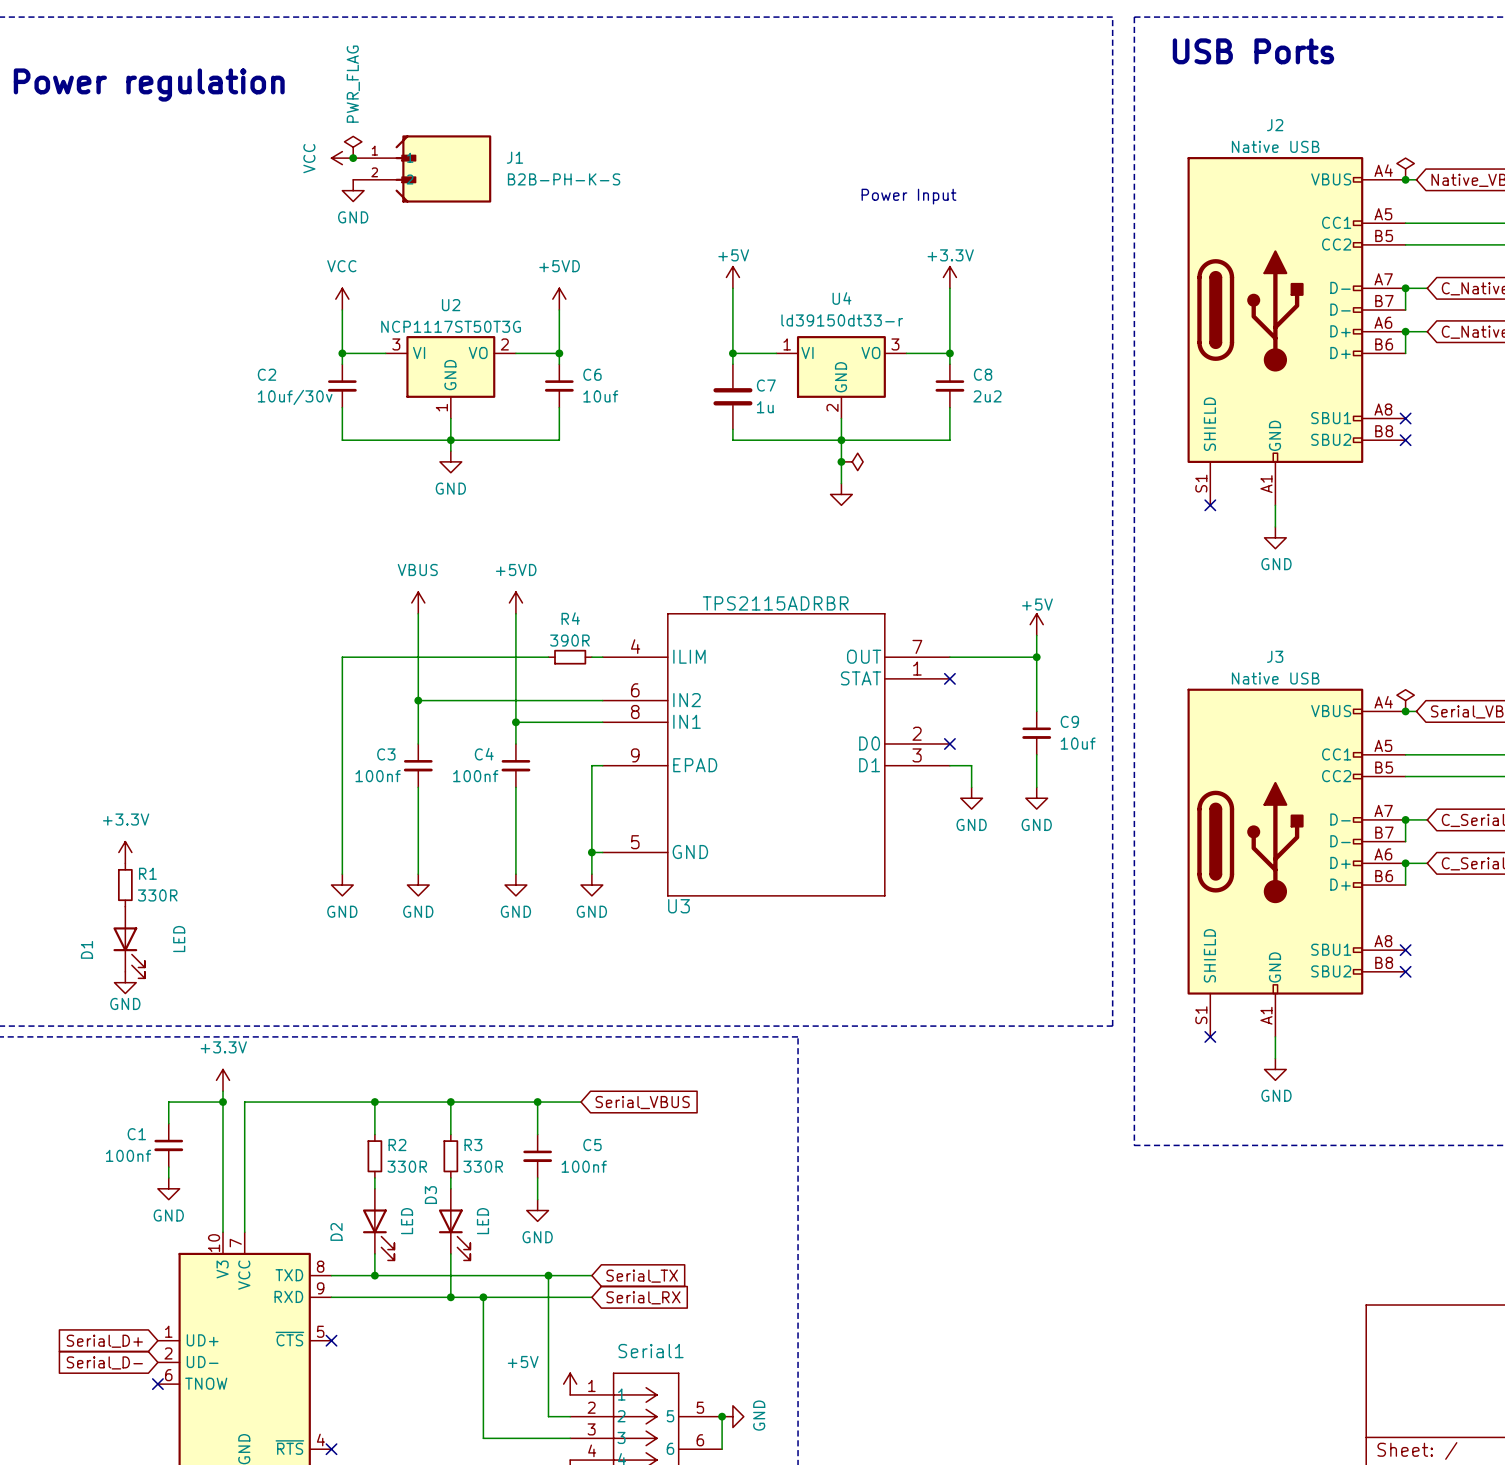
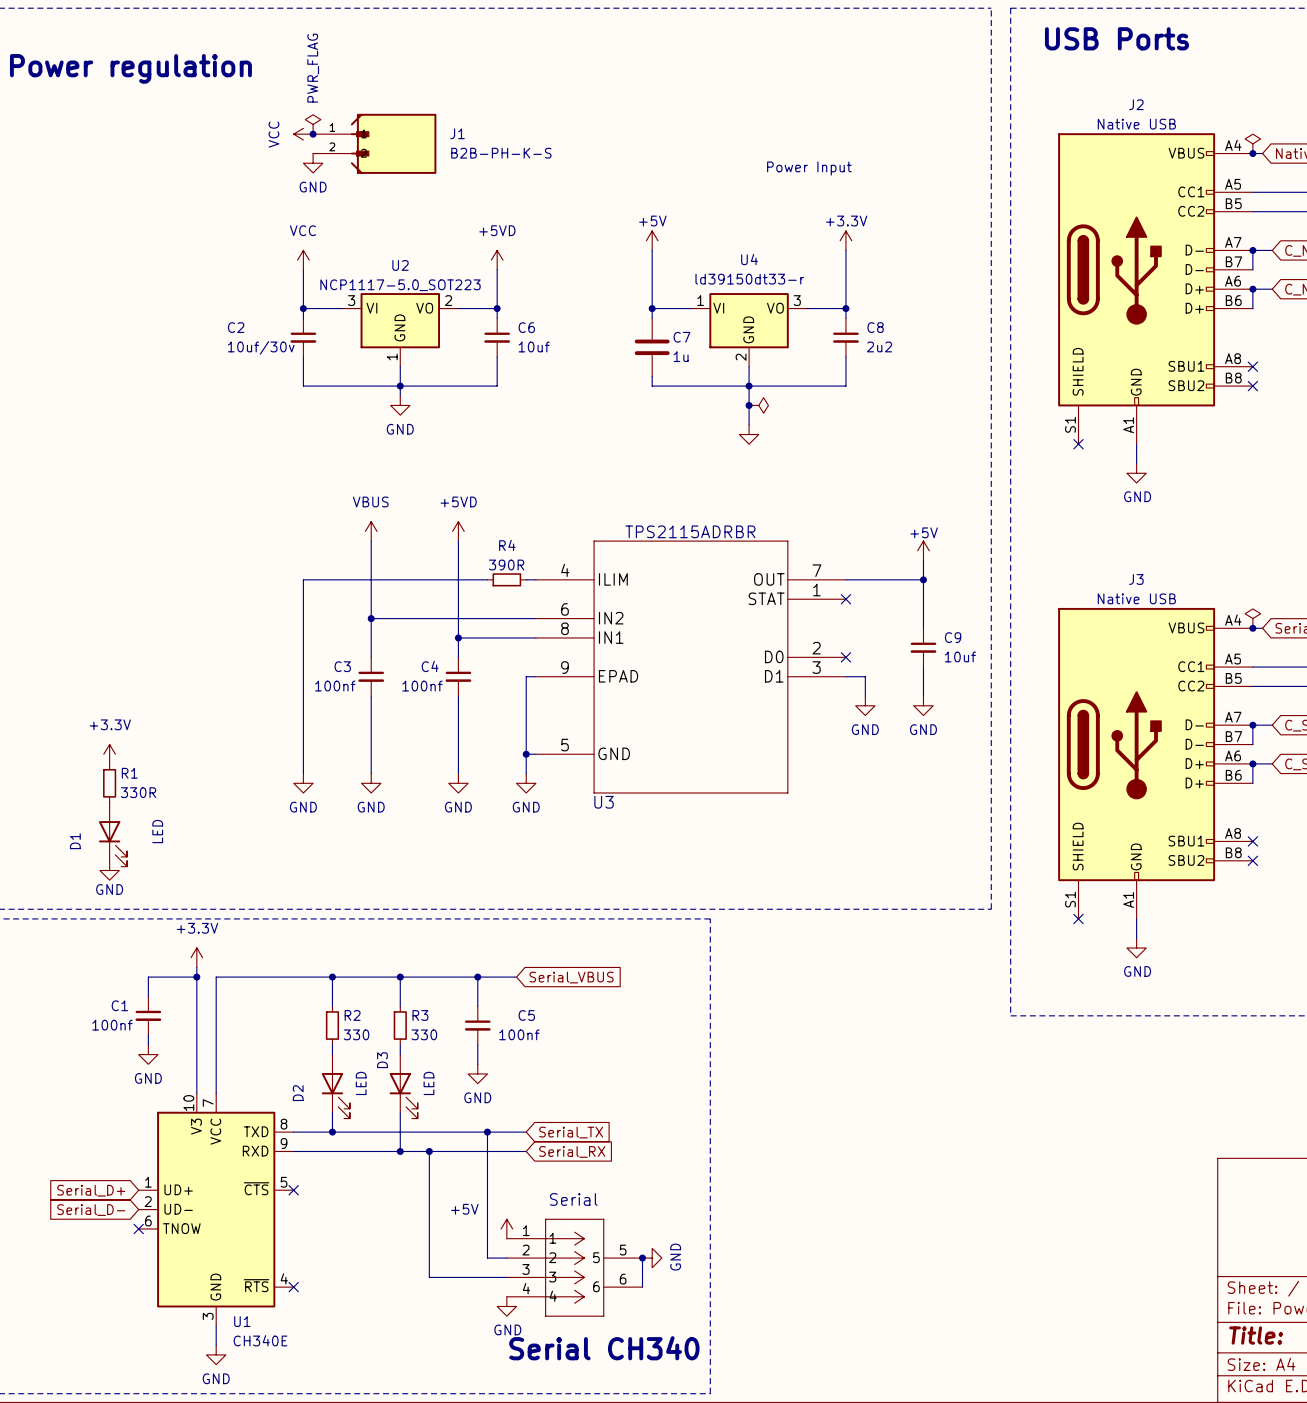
U2 value: NCP1117ST50T3G (451, 326) -> NCP1117-5.0_SOT223 (400, 285)
R2 value: 330R (407, 1166) -> 330 (356, 1034)
R3 value: 330R (483, 1166) -> 330 (424, 1034)
Serial1 name: Serial1 (651, 1351) -> Serial (573, 1199)

